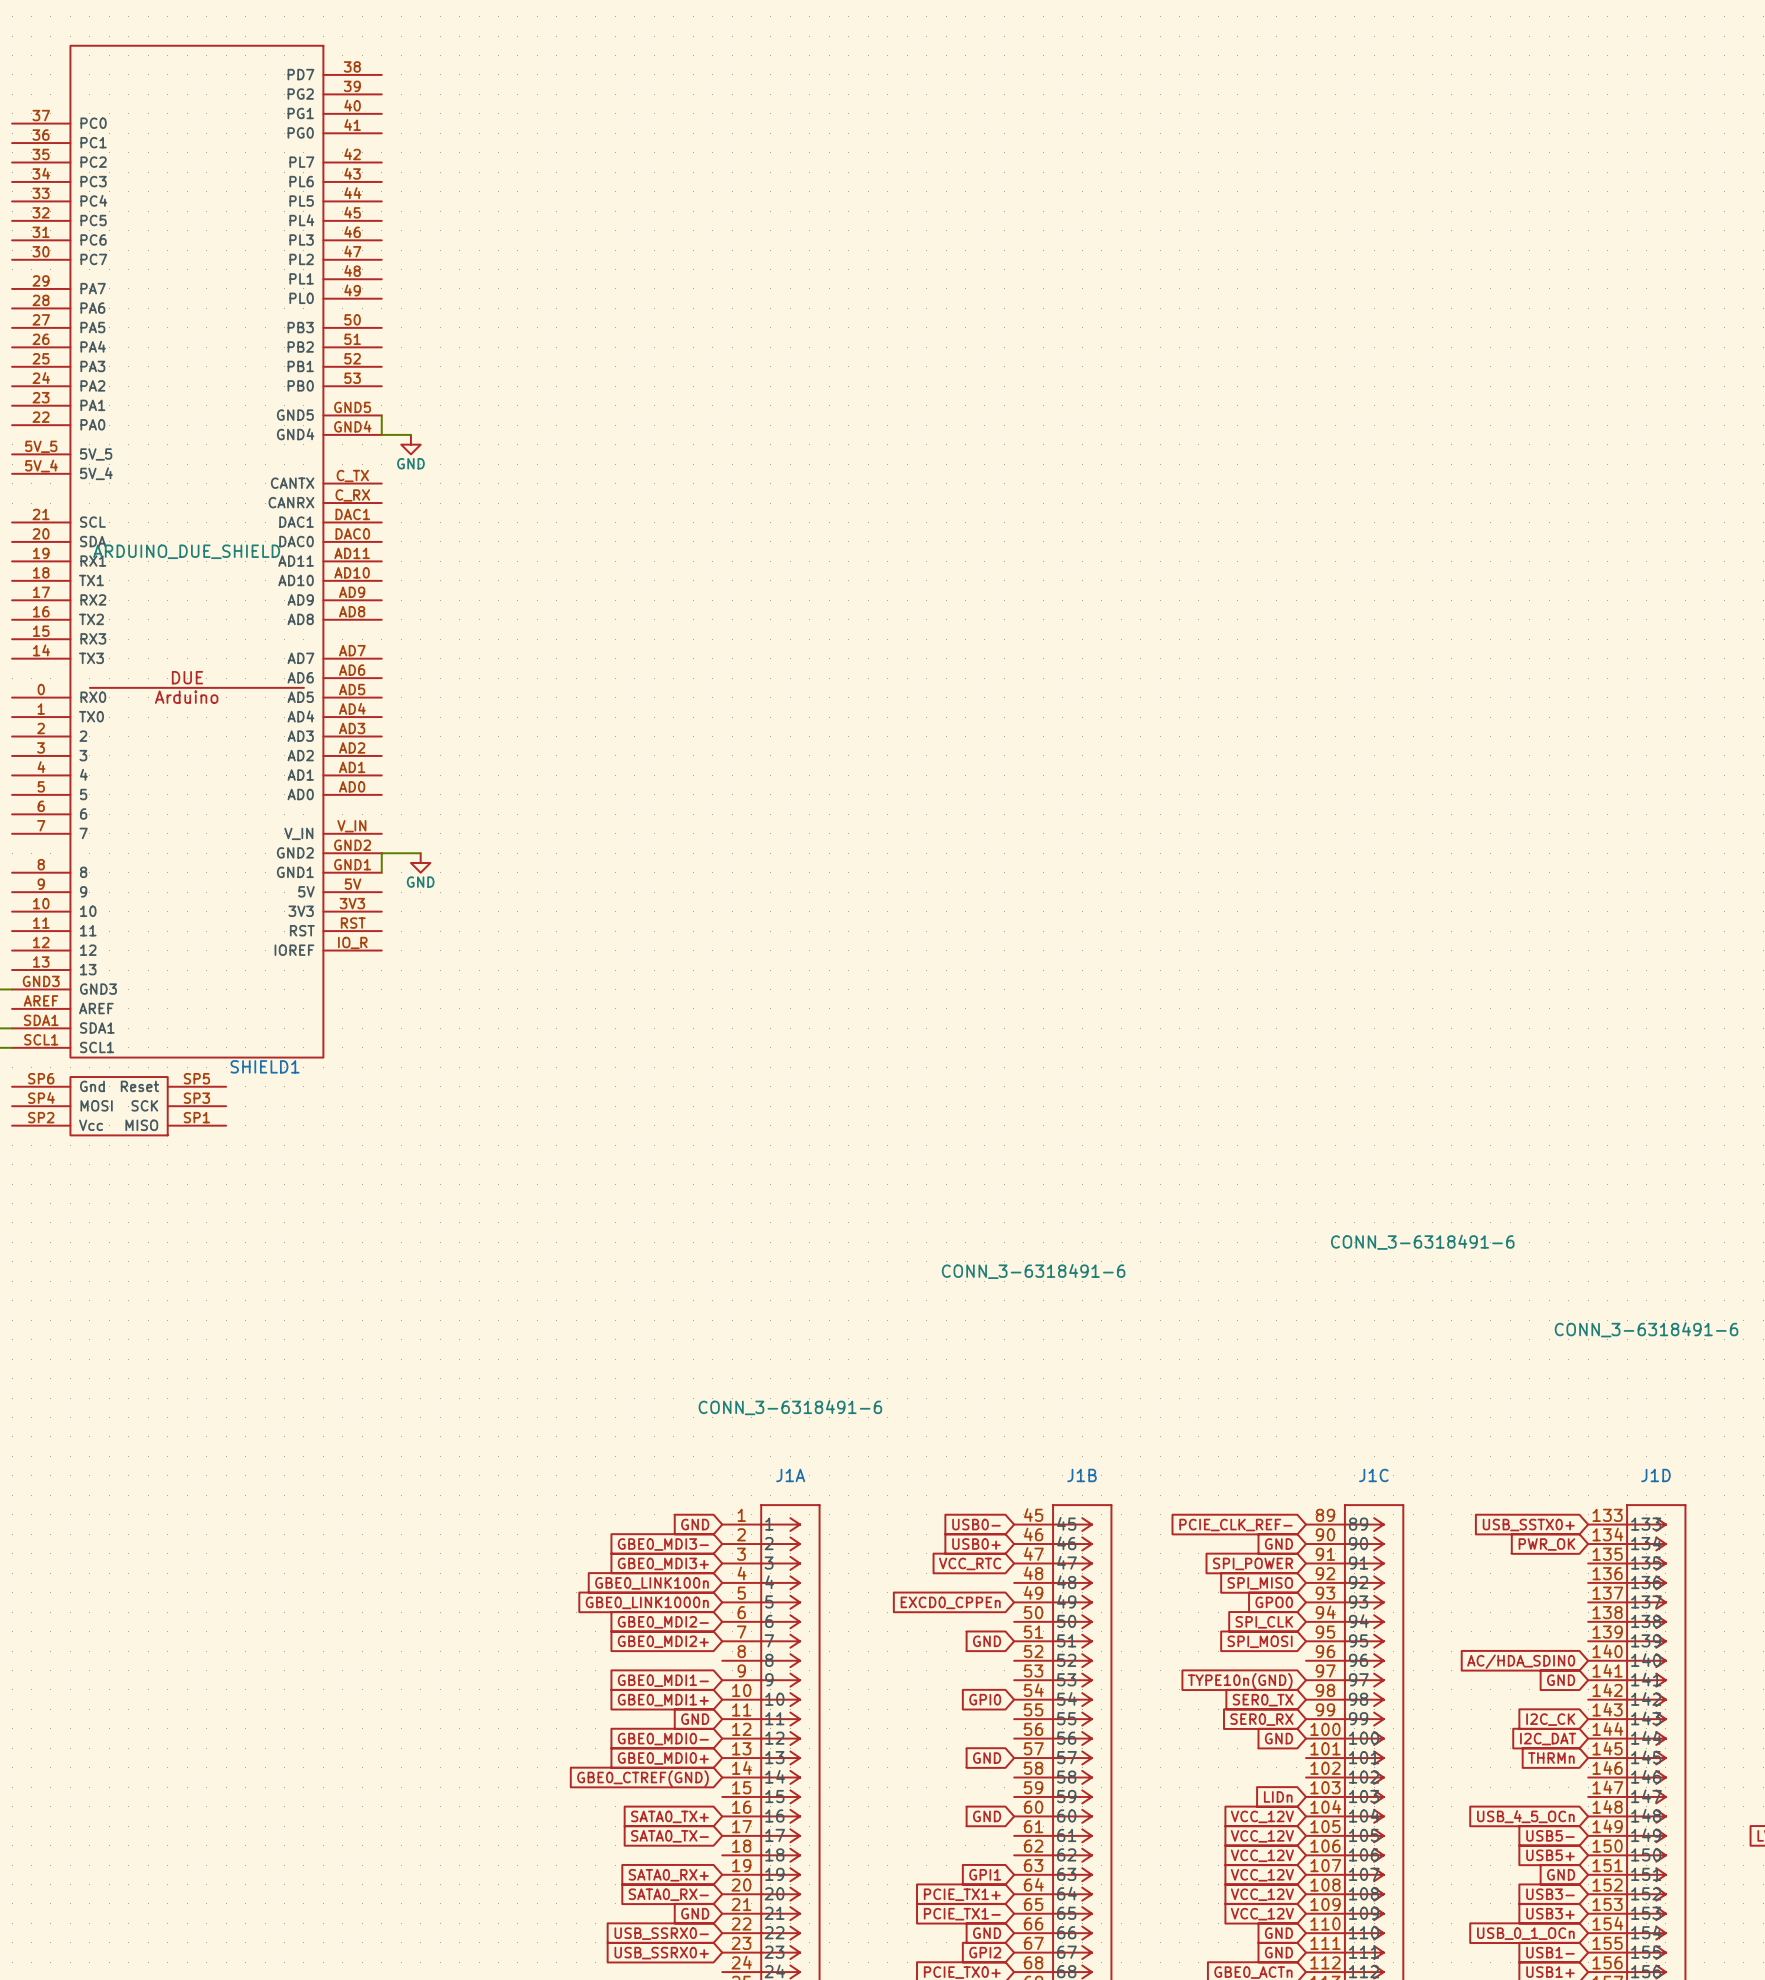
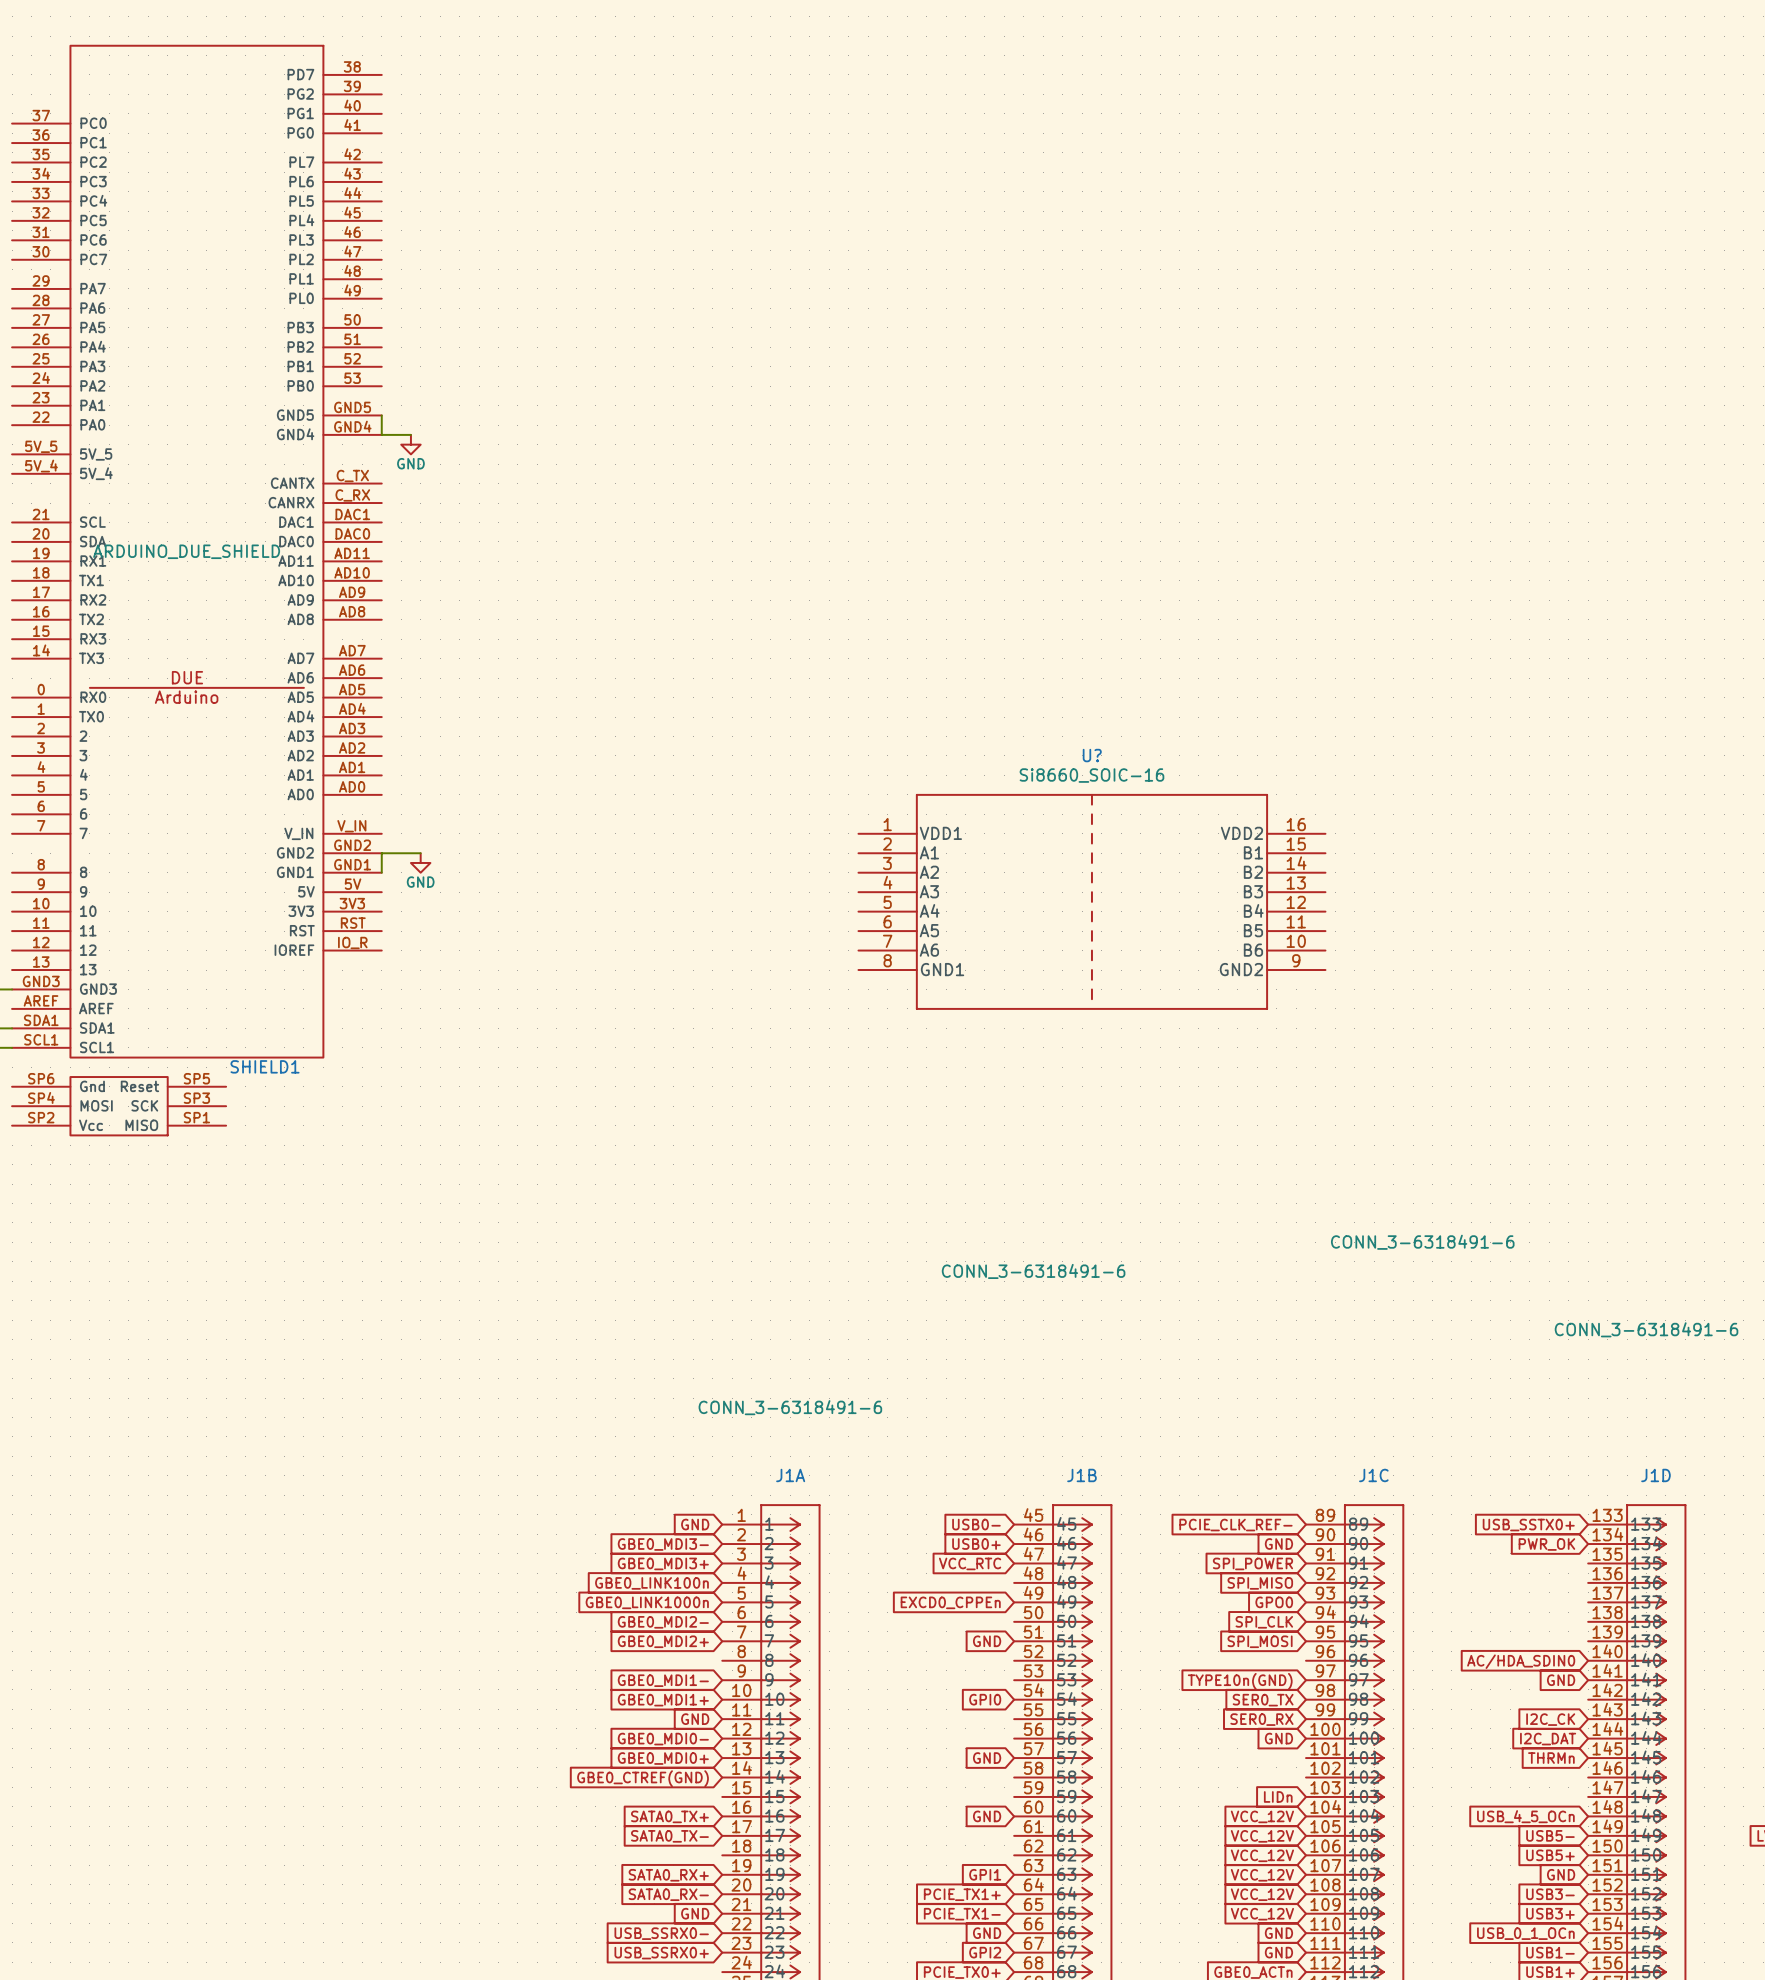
U?: none -> Si8660_SOIC-16 (1091, 901)

